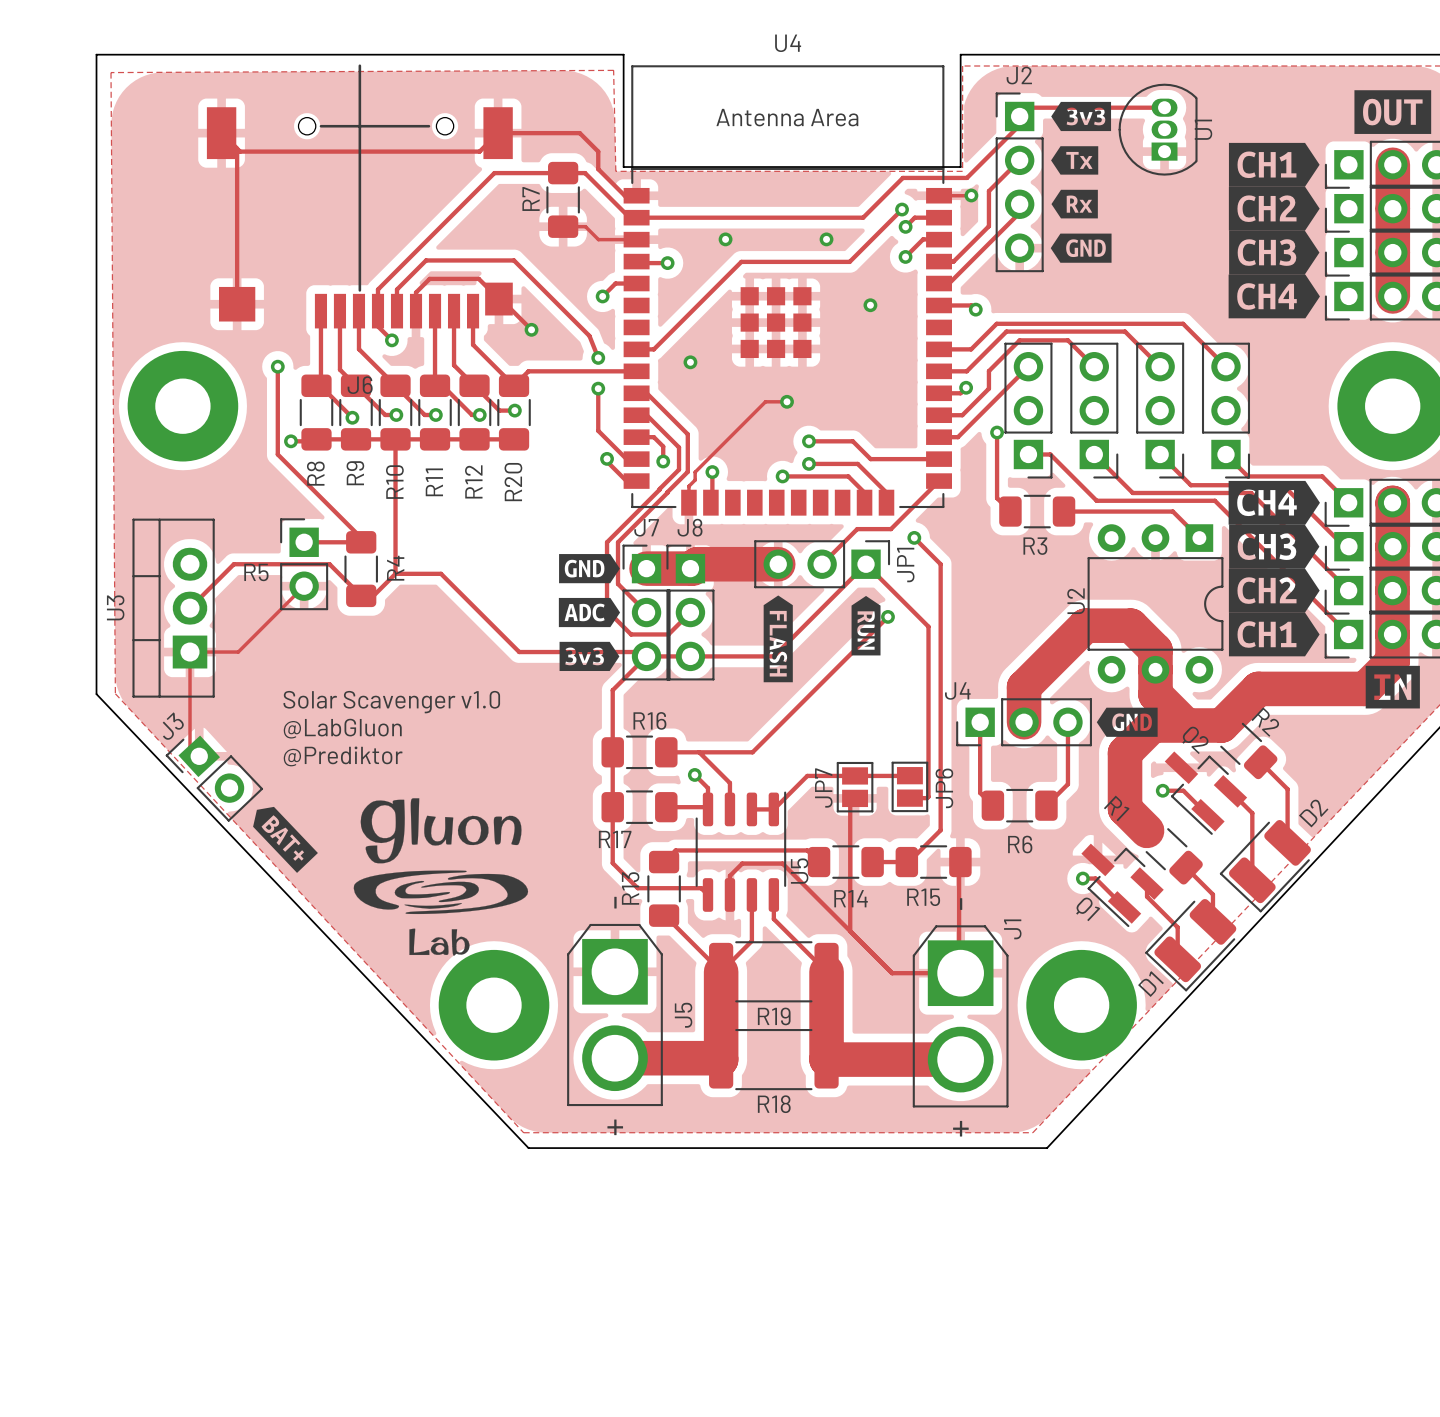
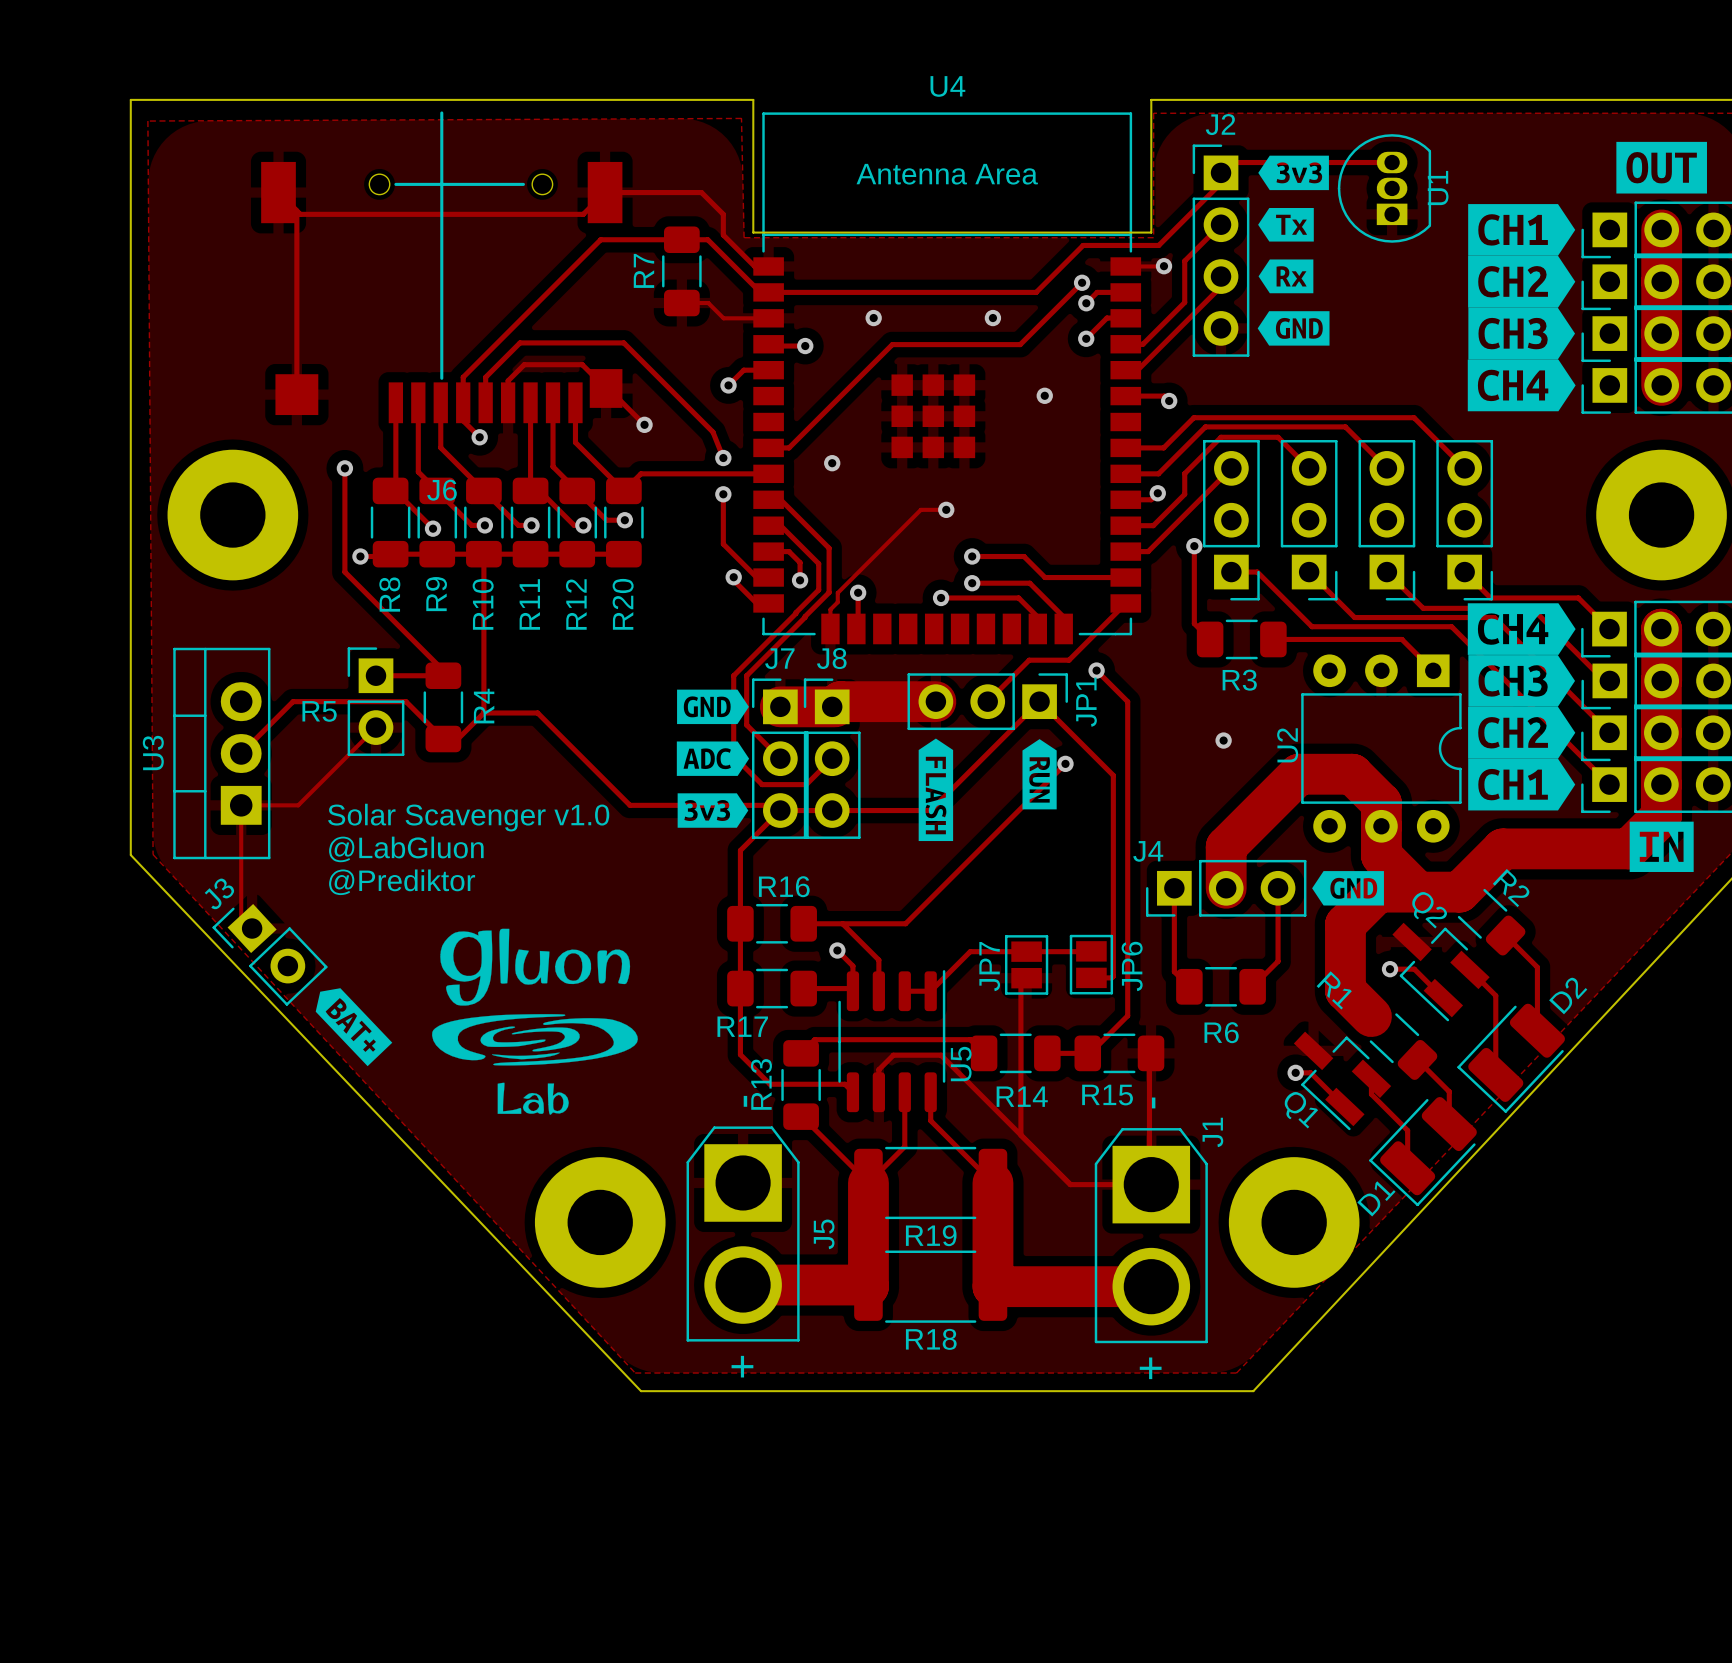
via: none -> (1223, 740)
text position: Solar Scavenger v1.0 (391, 702) -> Solar Scavenger v1.0 (468, 817)
text position: @LabGluon (342, 728) -> @LabGluon (406, 849)
text position: @Prediktor (343, 756) -> @Prediktor (402, 882)
drawing position: (440, 876) -> (534, 1021)

